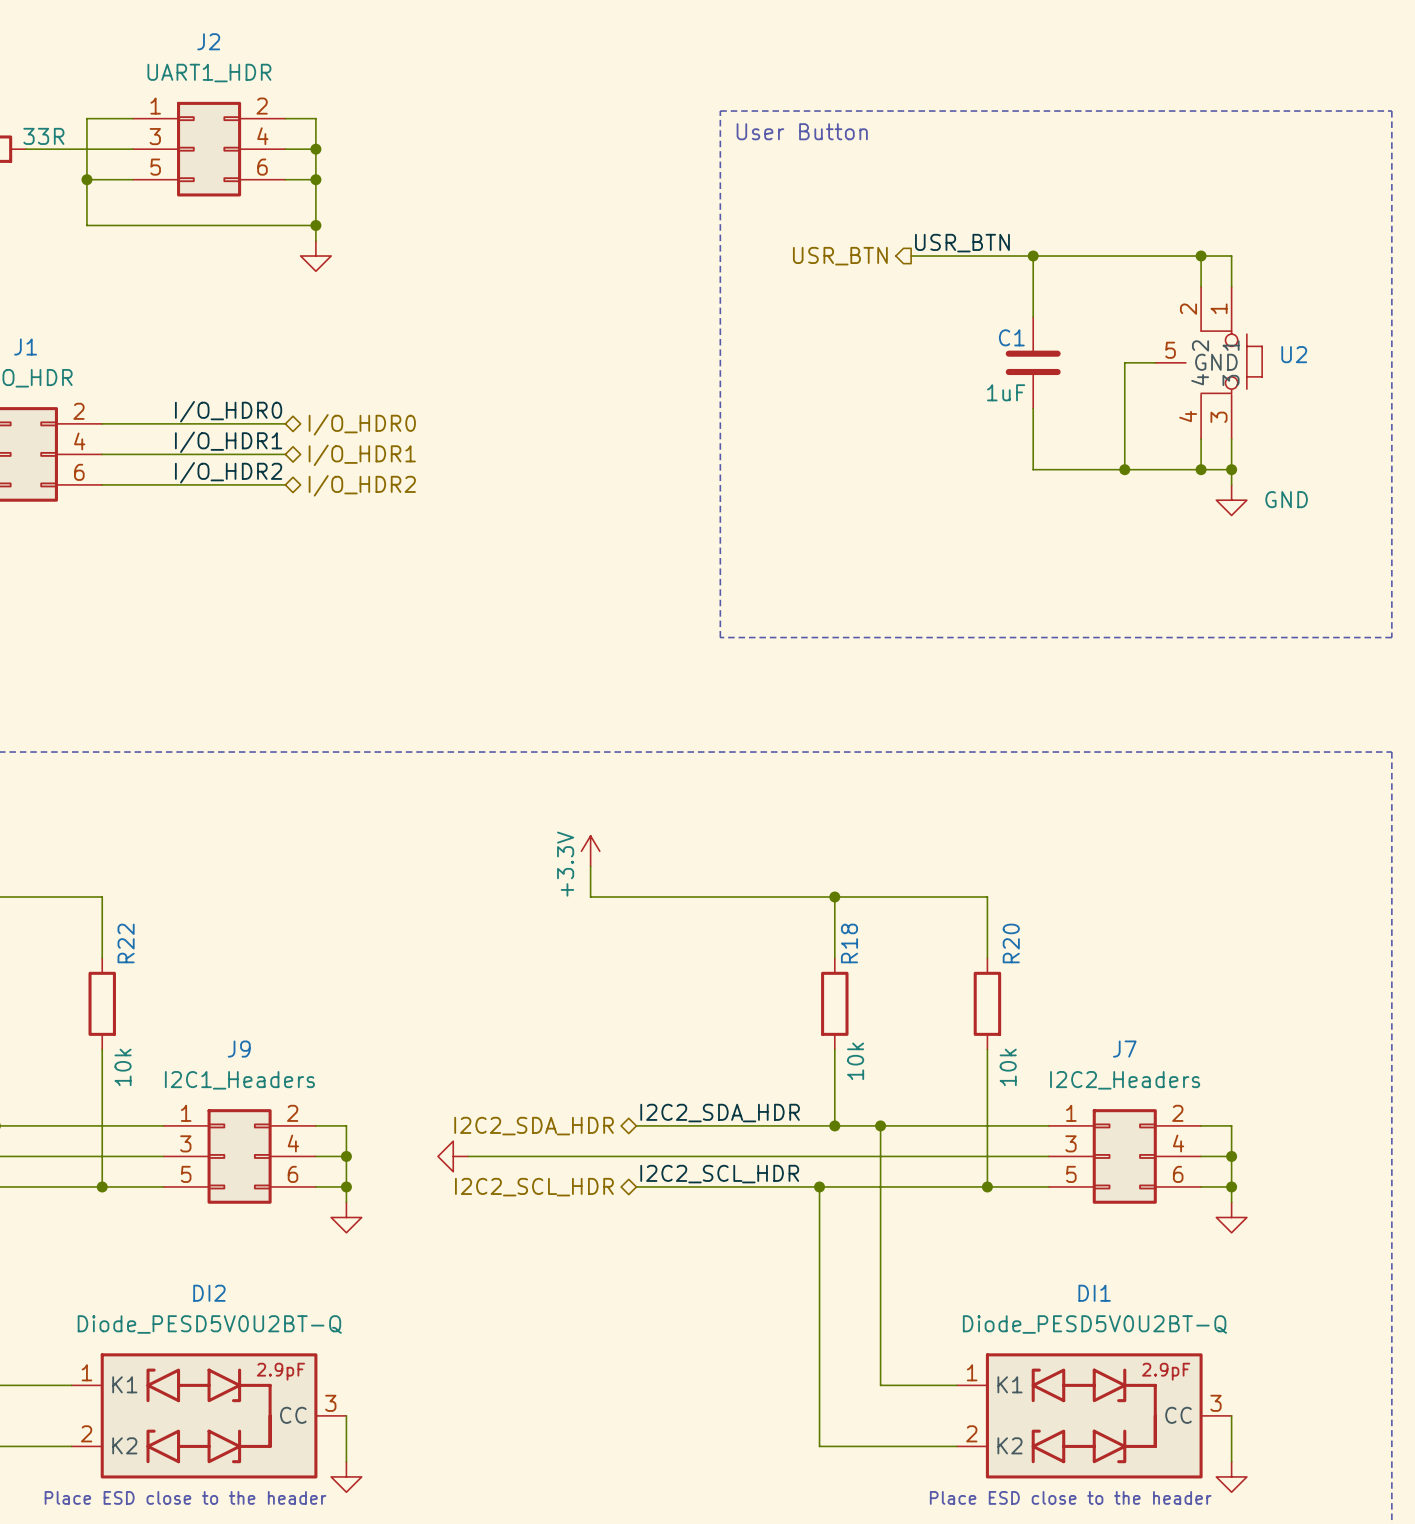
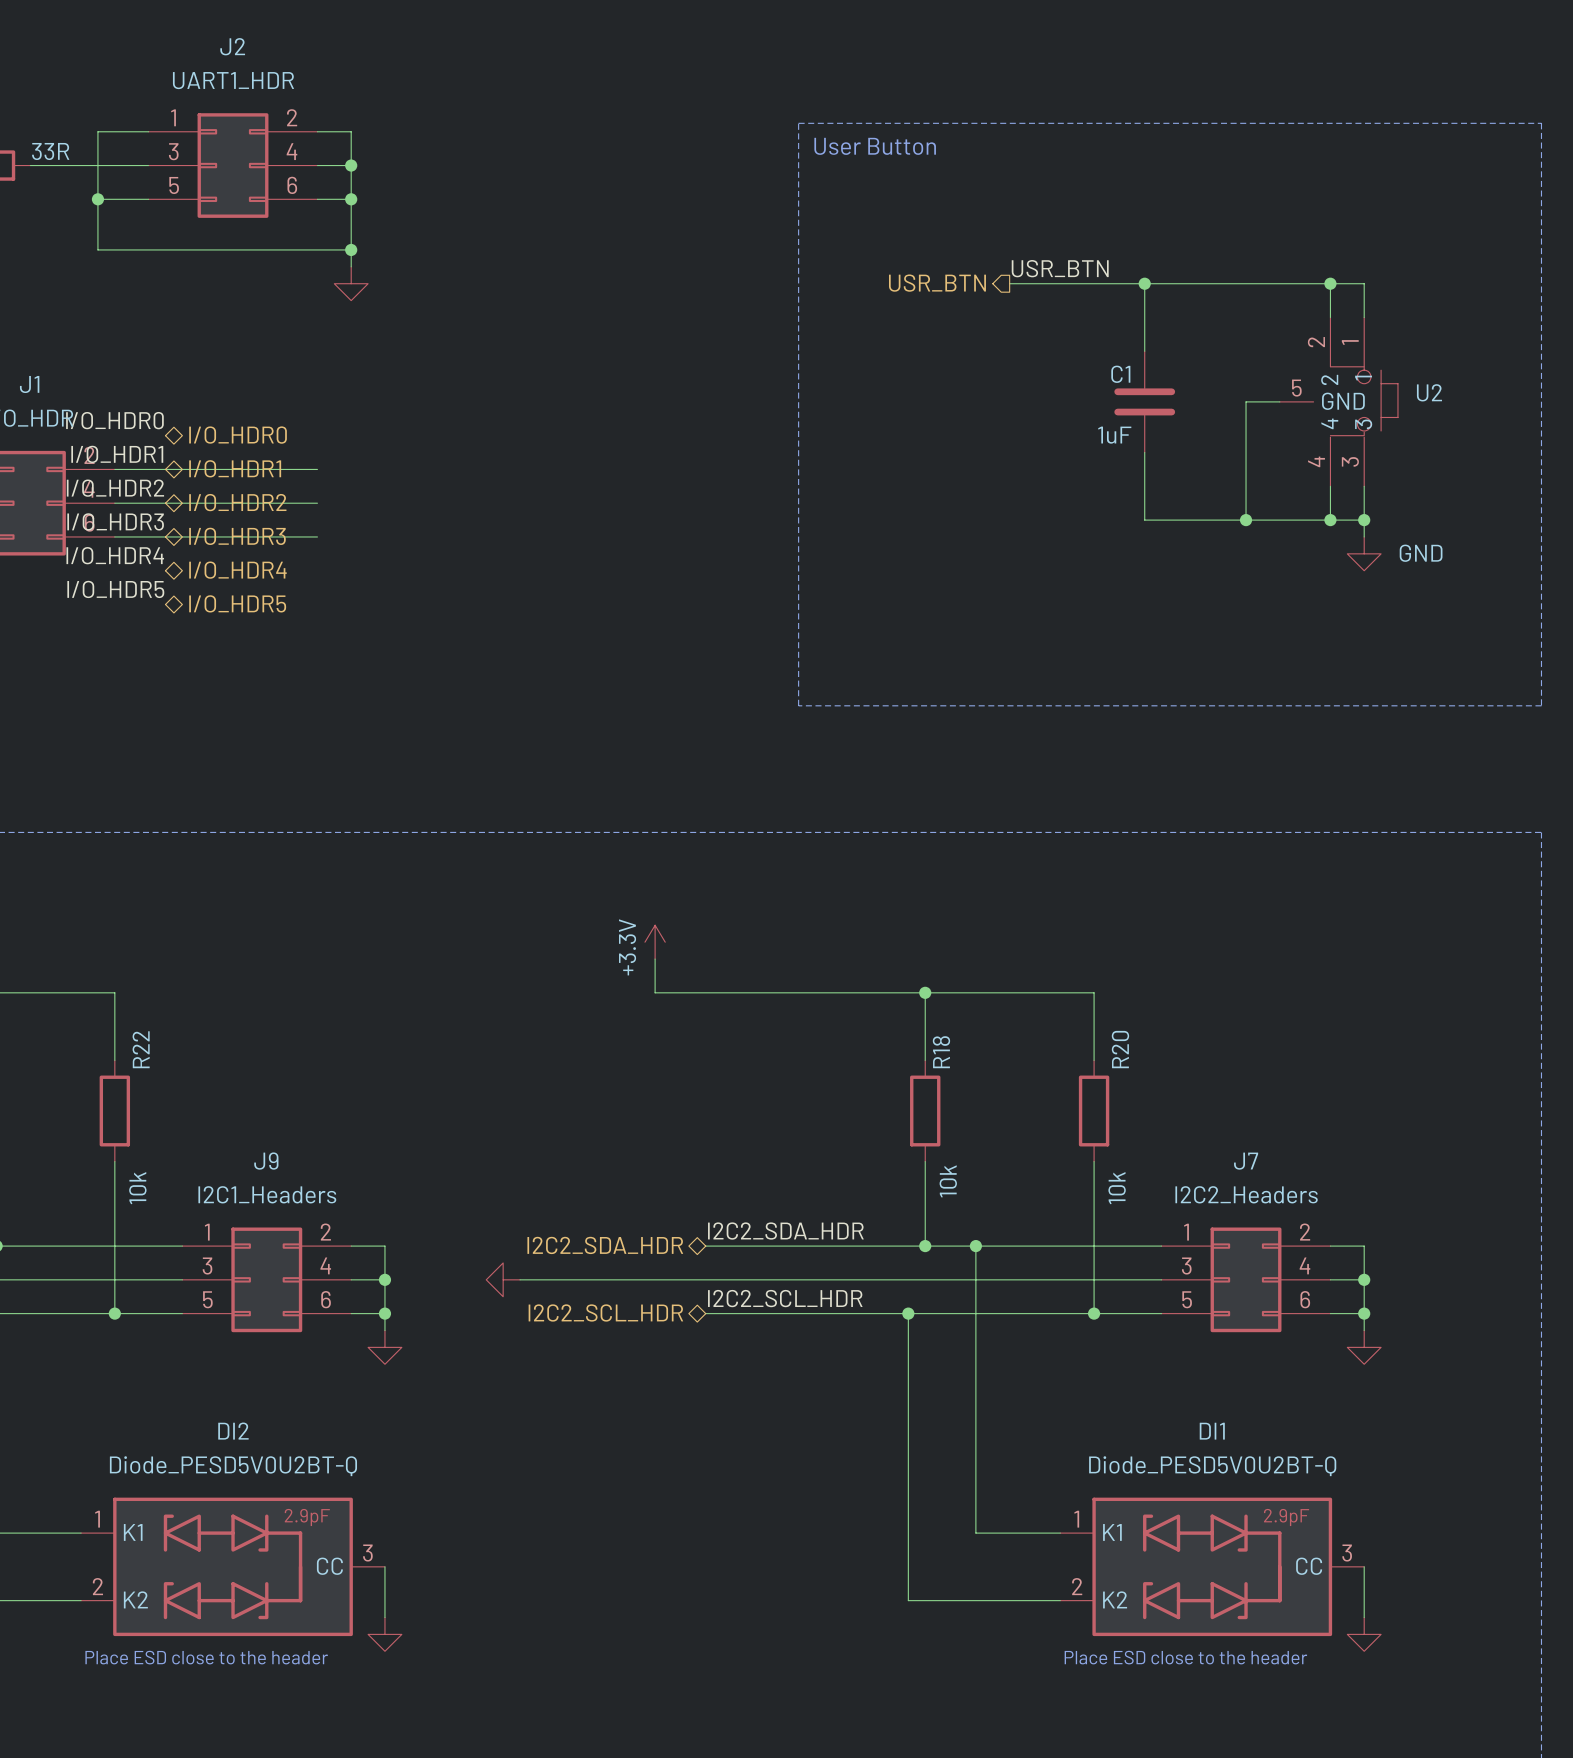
label position: I/O_HDR0 (228, 411) -> I/O_HDR0 (114, 420)
hierarchical label position: I/O_HDR0 (362, 424) -> I/O_HDR0 (238, 435)
label position: I/O_HDR1 (228, 442) -> I/O_HDR1 (117, 454)
hierarchical label position: I/O_HDR1 (362, 455) -> I/O_HDR1 (235, 468)
label: none -> I/O_HDR3 (115, 521)
label position: I/O_HDR2 (228, 472) -> I/O_HDR2 (115, 488)
hierarchical label: none -> I/O_HDR3 (237, 536)
hierarchical label position: I/O_HDR2 (362, 485) -> I/O_HDR2 (237, 502)
label: none -> I/O_HDR4 (115, 555)
hierarchical label: none -> I/O_HDR4 (237, 570)
label: none -> I/O_HDR5 (115, 589)
hierarchical label: none -> I/O_HDR5 (237, 603)

